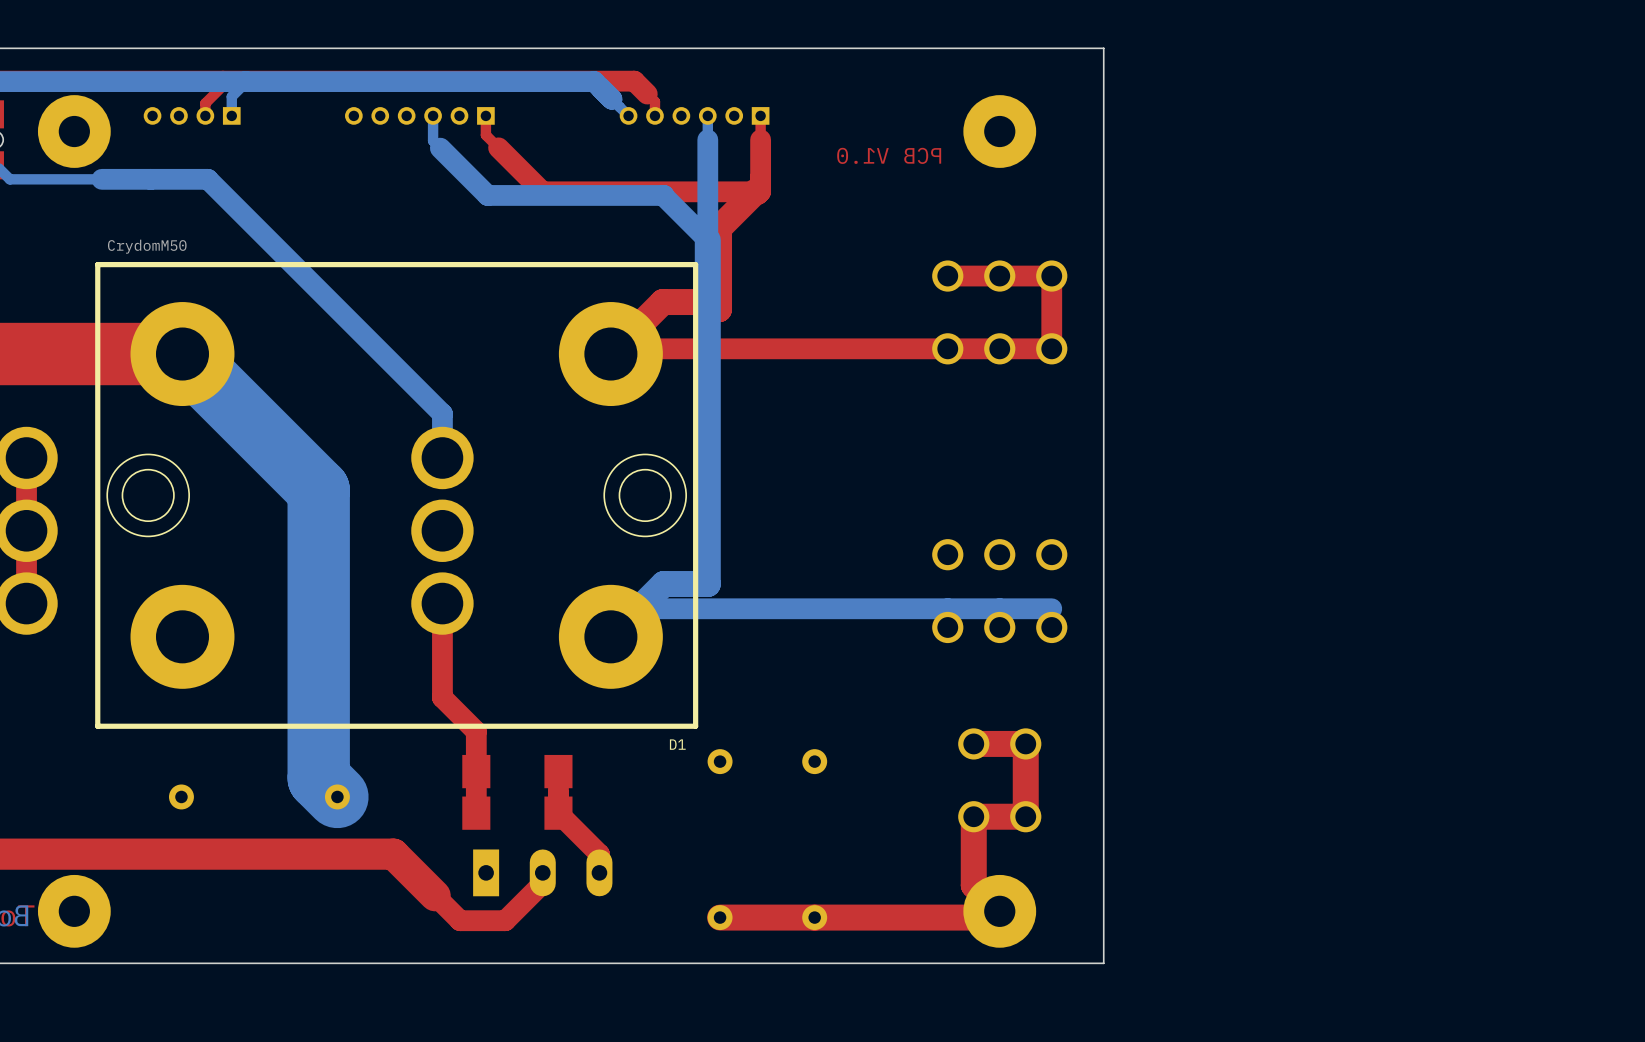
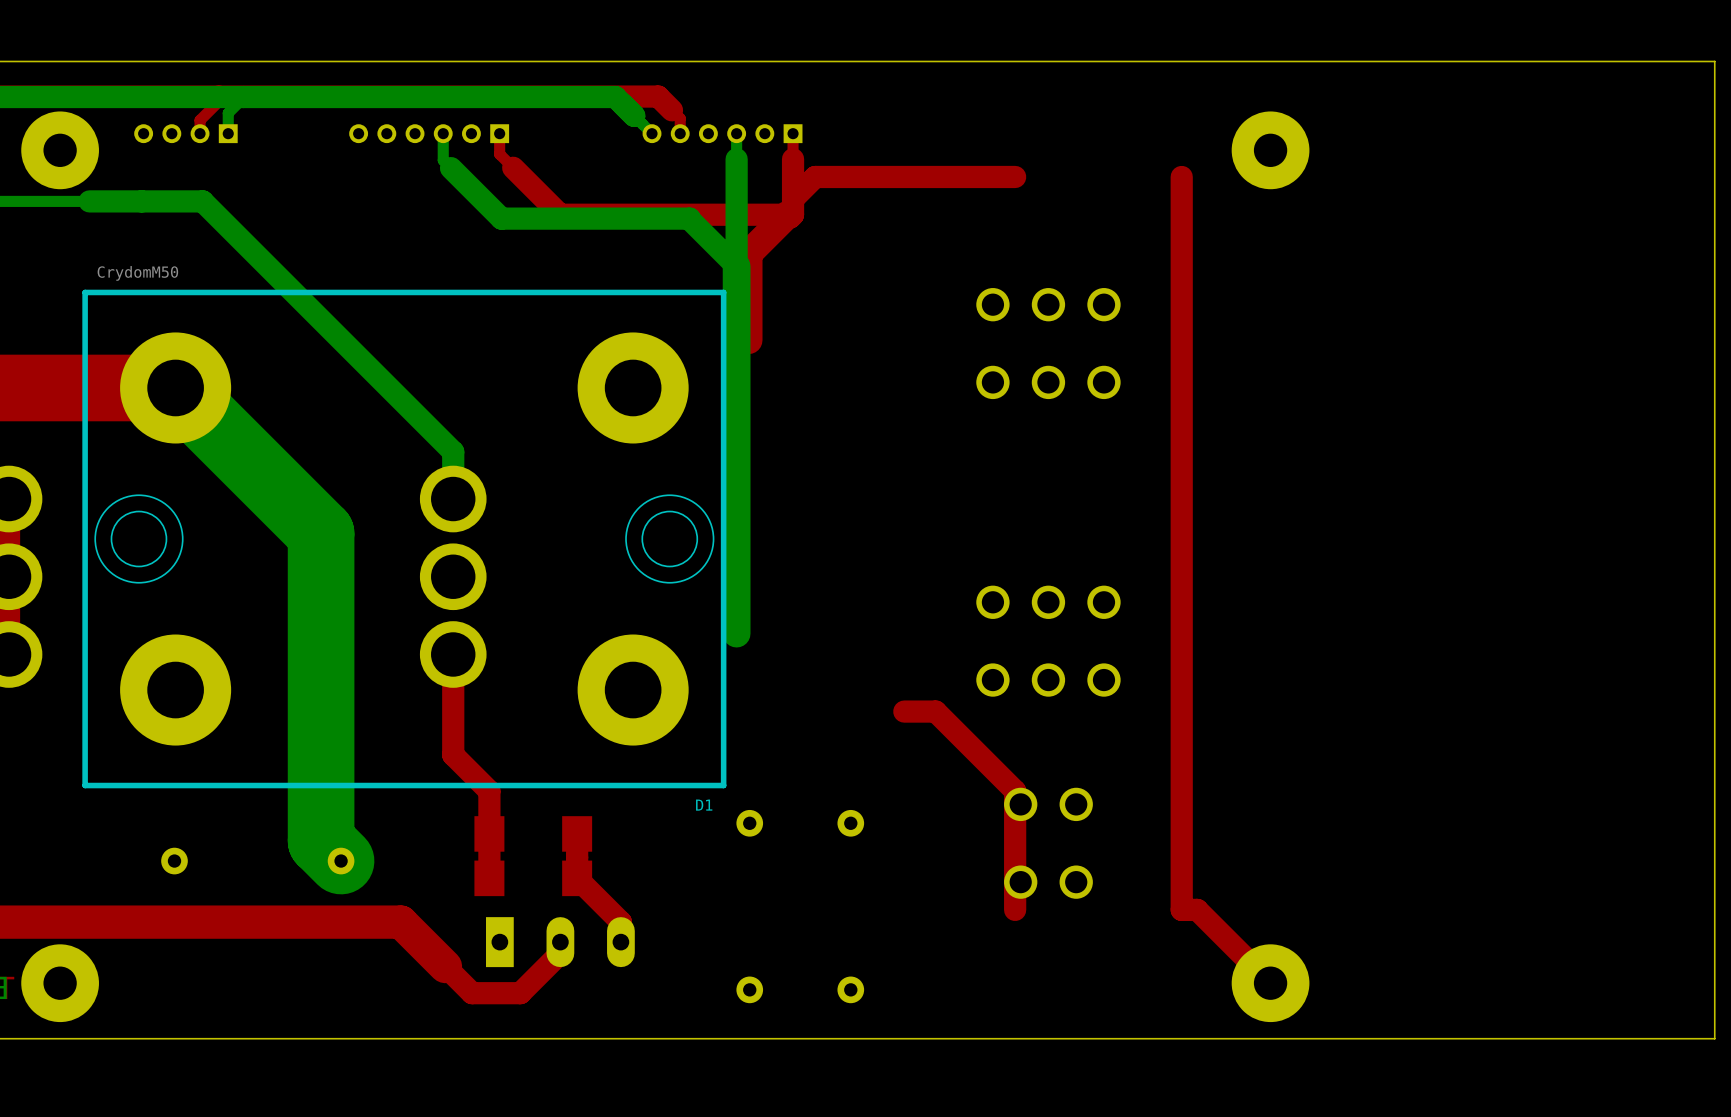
board edge: (1103, 48) (1103, 963) -> (1159, 61) (1714, 61) (1714, 1038) (1159, 1038)
part position: (999, 131) -> (1270, 150)
top track: none -> (1015, 176) (815, 176) (793, 199)
top track: none -> (1181, 176) (1181, 909) (1197, 909) (1270, 983)
top track: (947, 276) (1051, 276) (1051, 348) (616, 348) (610, 354) (662, 302) (711, 302) (719, 309) -> none
bottom track: (707, 584) (663, 584) (610, 636) (638, 608) (1051, 608) -> none
top track: none -> (904, 711) (935, 711) (1015, 790) (1015, 909)
top track: (973, 743) (1025, 743) (1025, 816) (973, 816) (973, 885) (999, 911) (993, 917) (720, 917) -> none
part position: (999, 911) -> (1270, 983)

